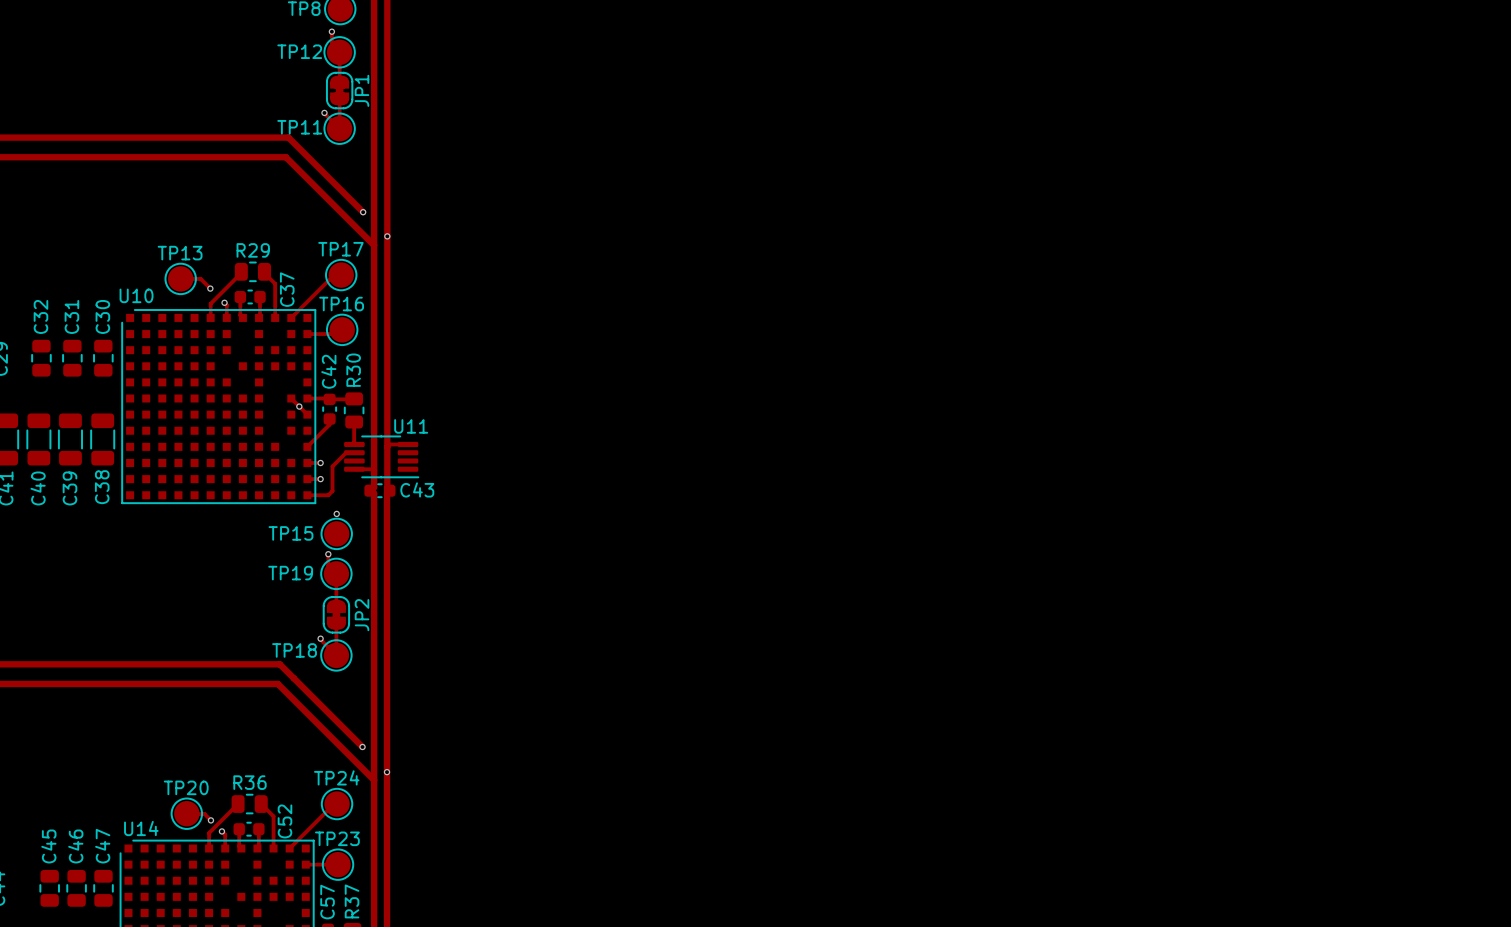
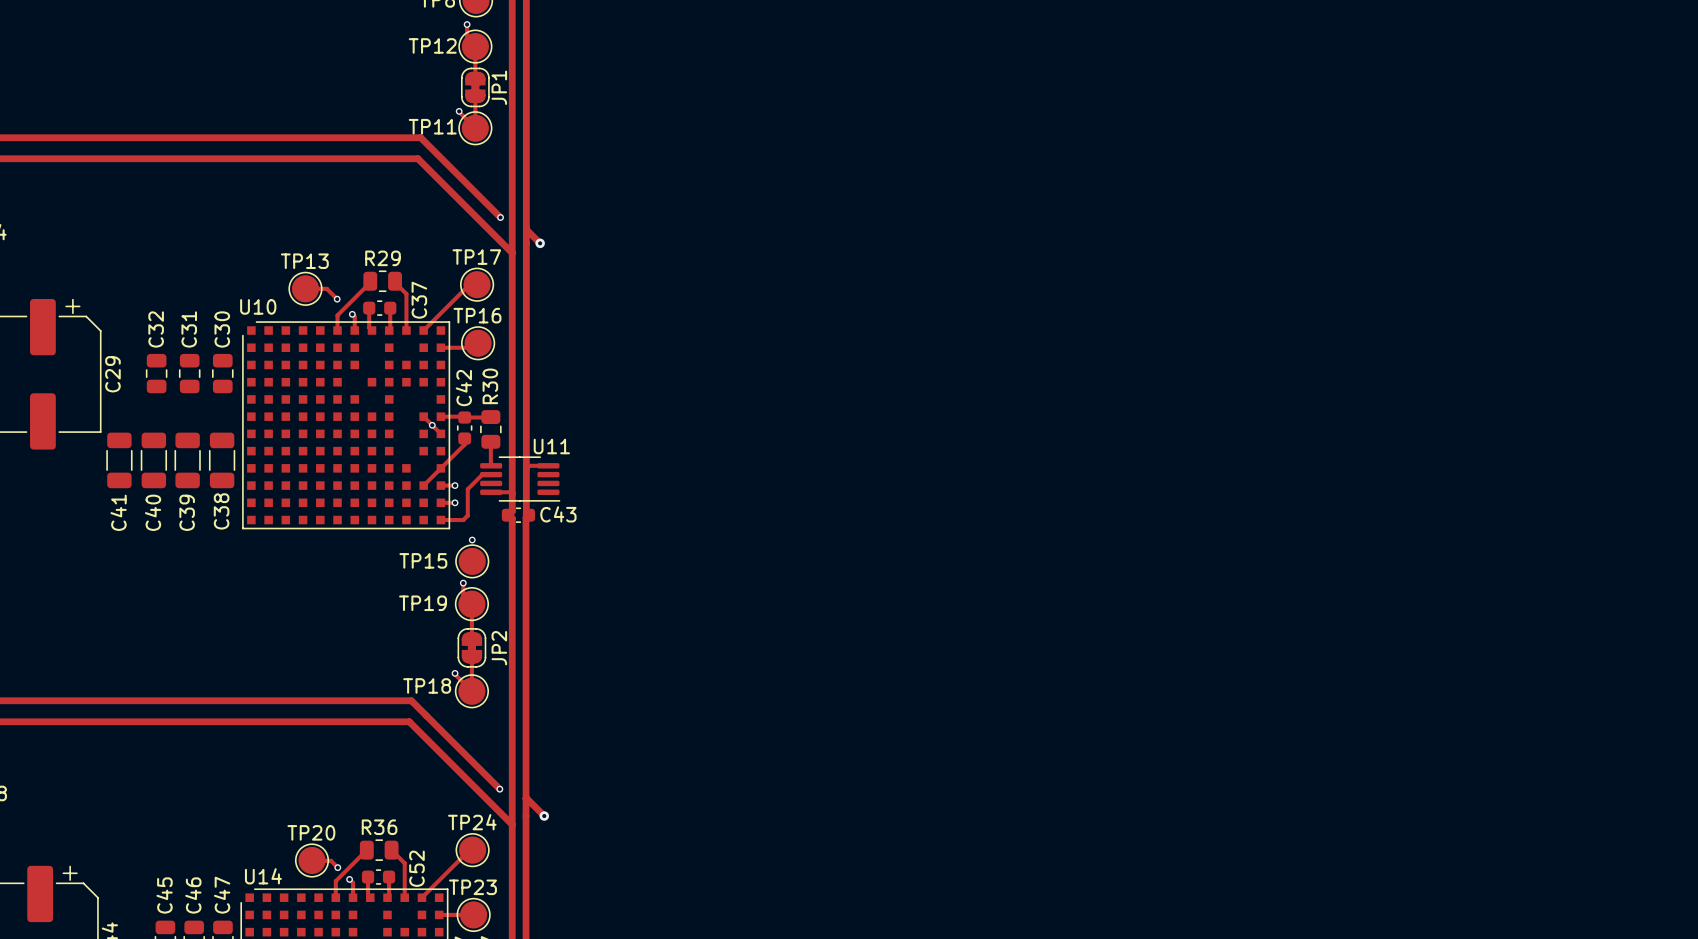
track: none -> (526, 229) (540, 243)
via: (387, 236) -> none
via: none -> (540, 243)
track: none -> (440, 468) (423, 485)
track: none -> (526, 798) (544, 816)
via: (387, 772) -> none
via: none -> (544, 816)

